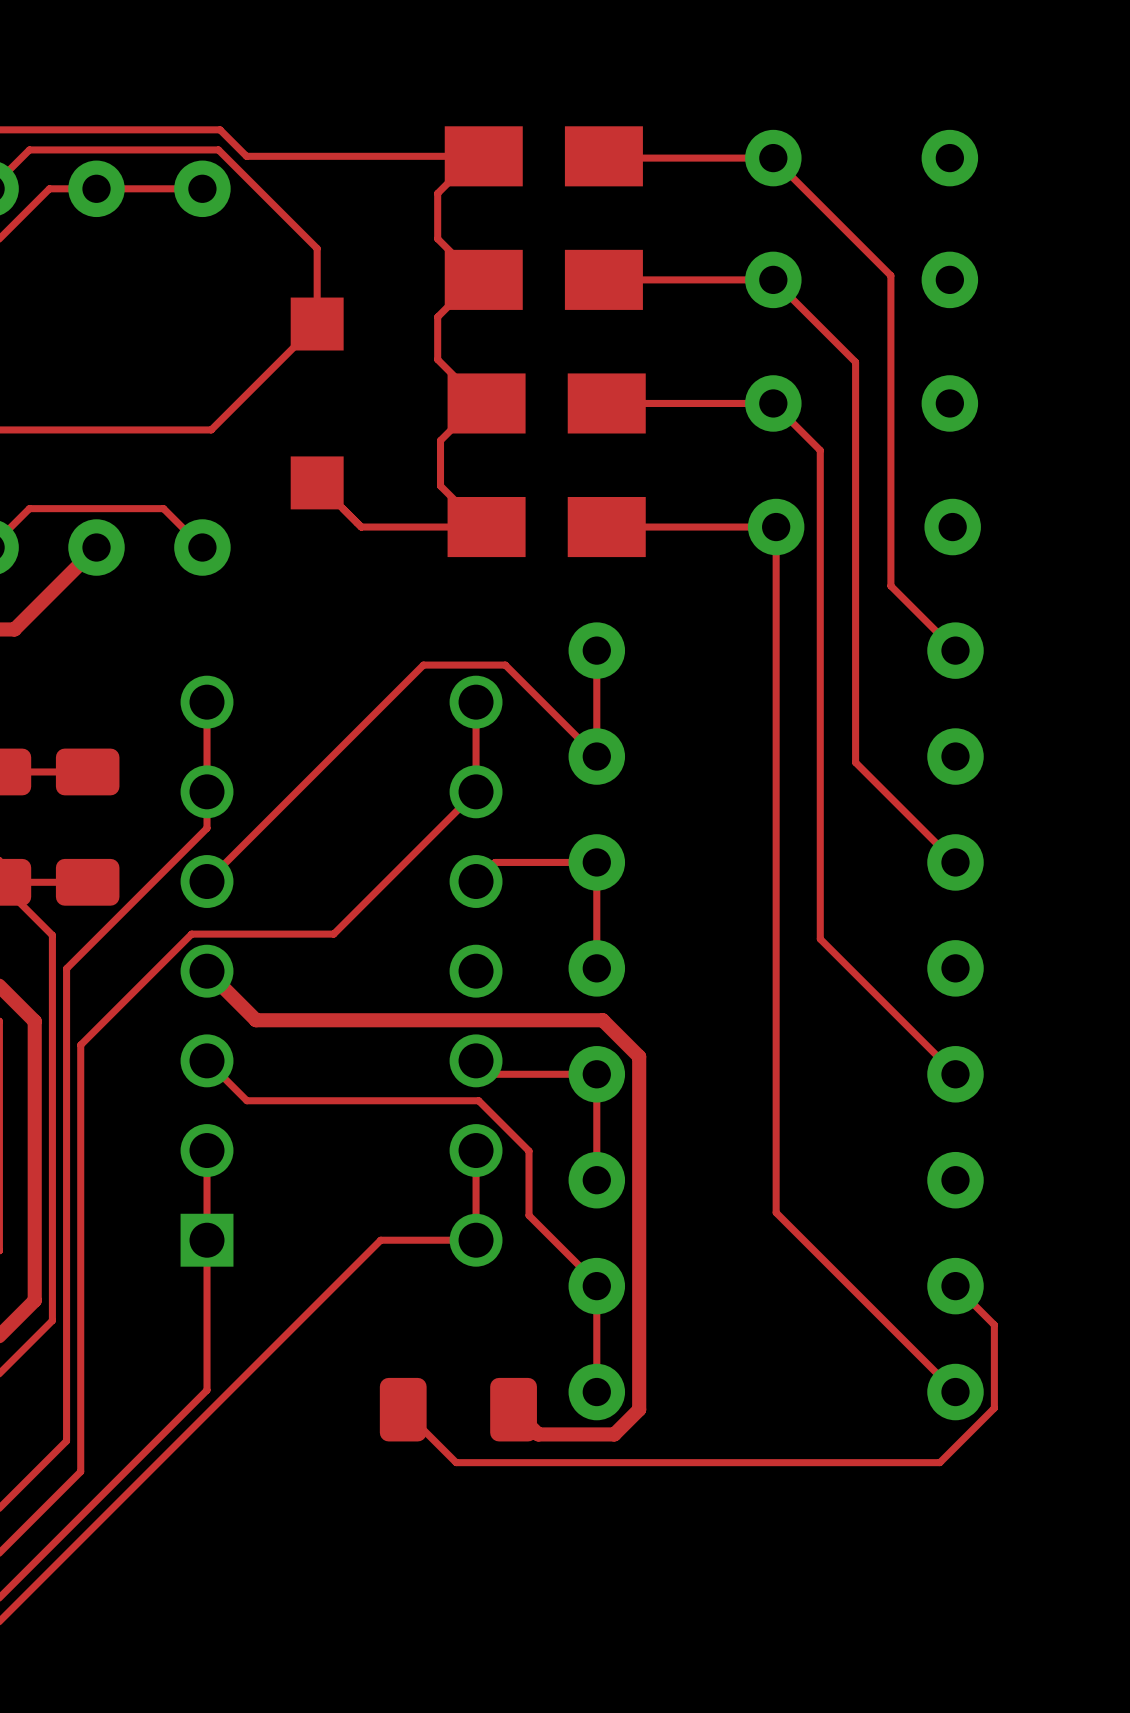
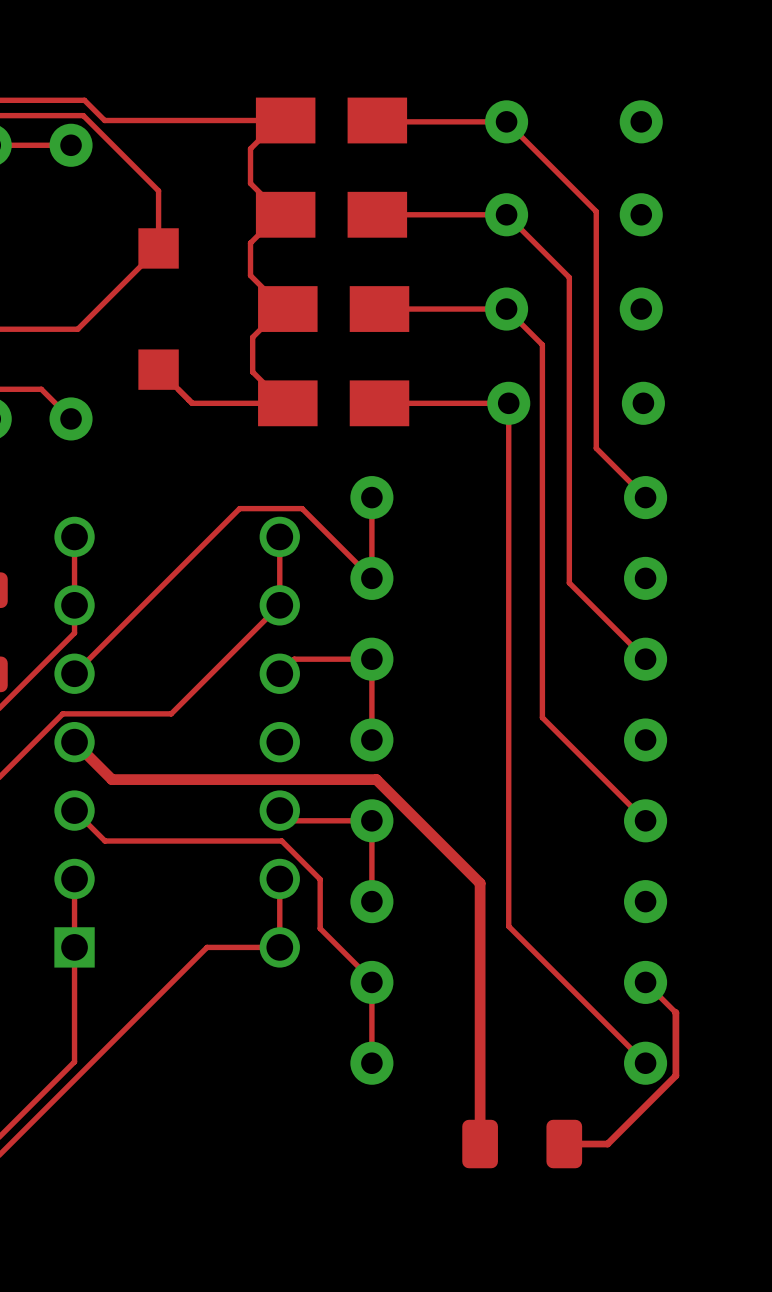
top track: (639, 1056) (639, 1409) (614, 1434) (538, 1434) (513, 1409) -> (404, 807) (480, 883) (480, 1144)
top track: (994, 1324) (994, 1408) (939, 1462) (456, 1462) (403, 1409) -> (675, 1012) (675, 1075) (607, 1144) (564, 1144)
part position: (458, 1409) -> (522, 1144)

